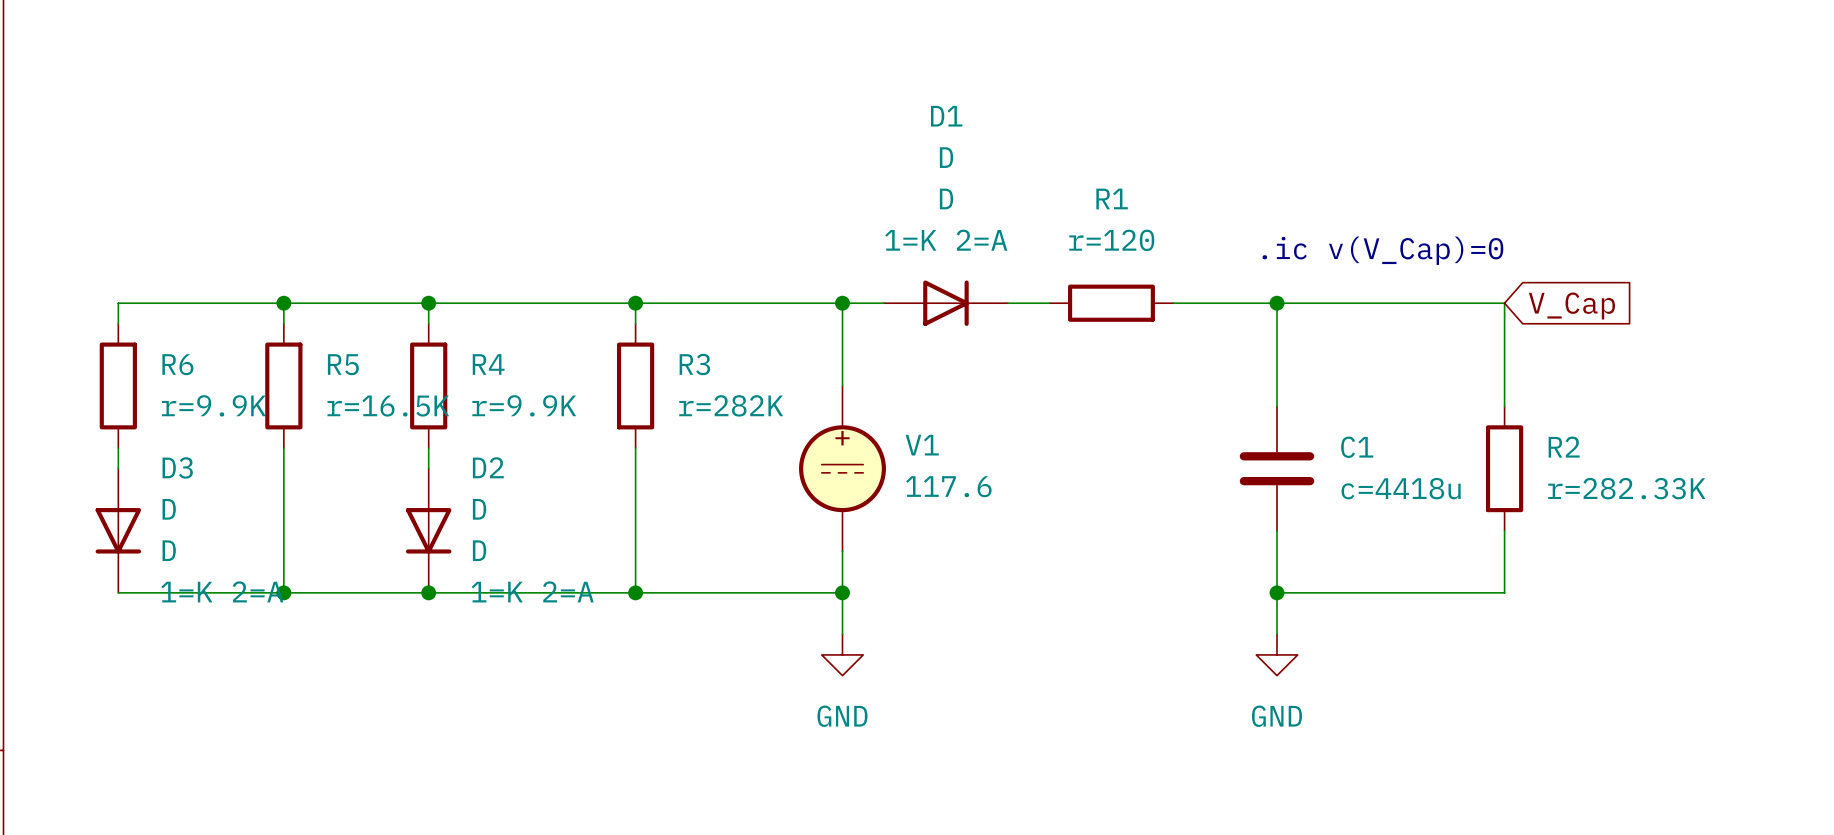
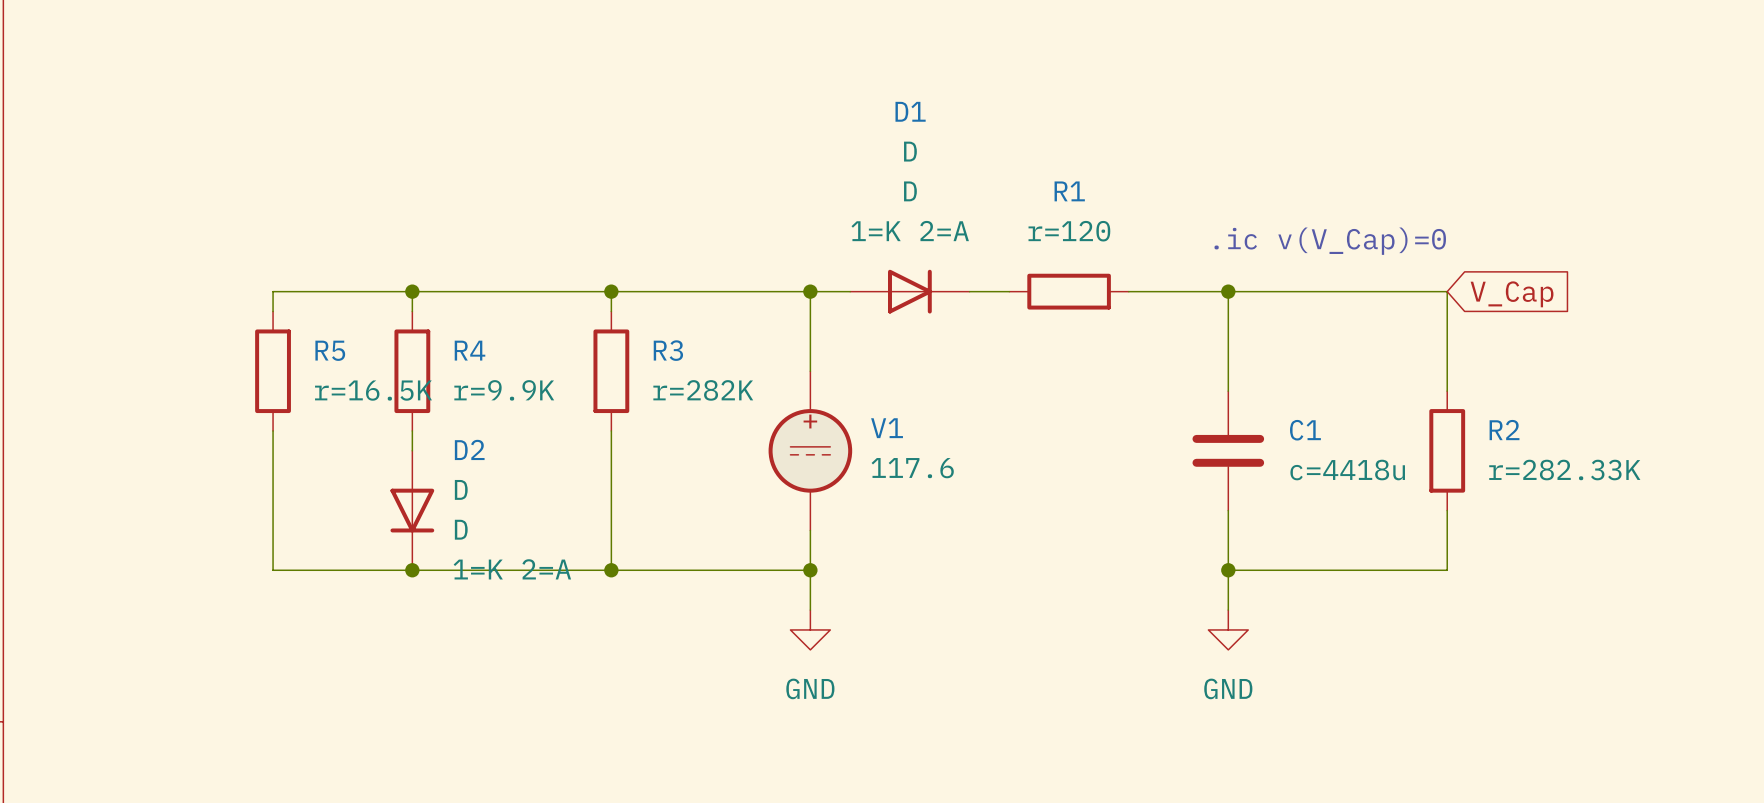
wire: (283, 303) (118, 303) (118, 323) -> none
junction: (283, 303) -> none
R6: r=9.9K (118, 385) -> none
wire: (118, 448) (118, 468) -> none
D3: D (118, 530) -> none
wire: (118, 592) (283, 592) -> none
junction: (283, 592) -> none

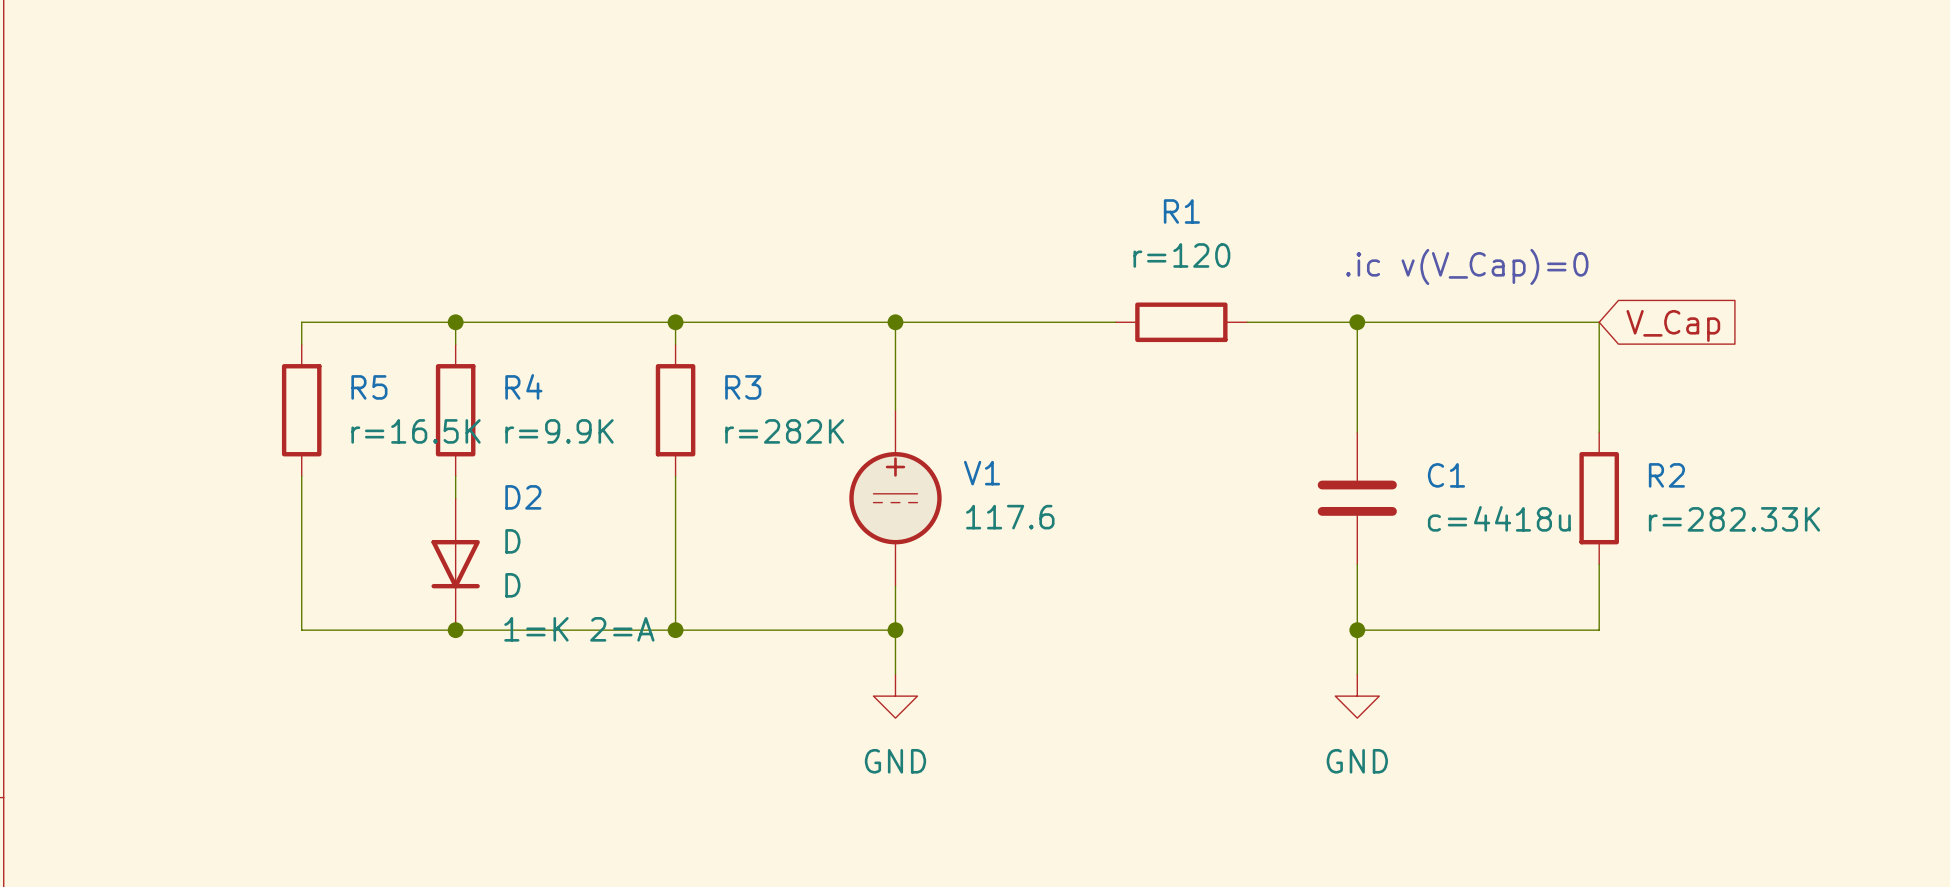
D1: D (909, 291) -> none

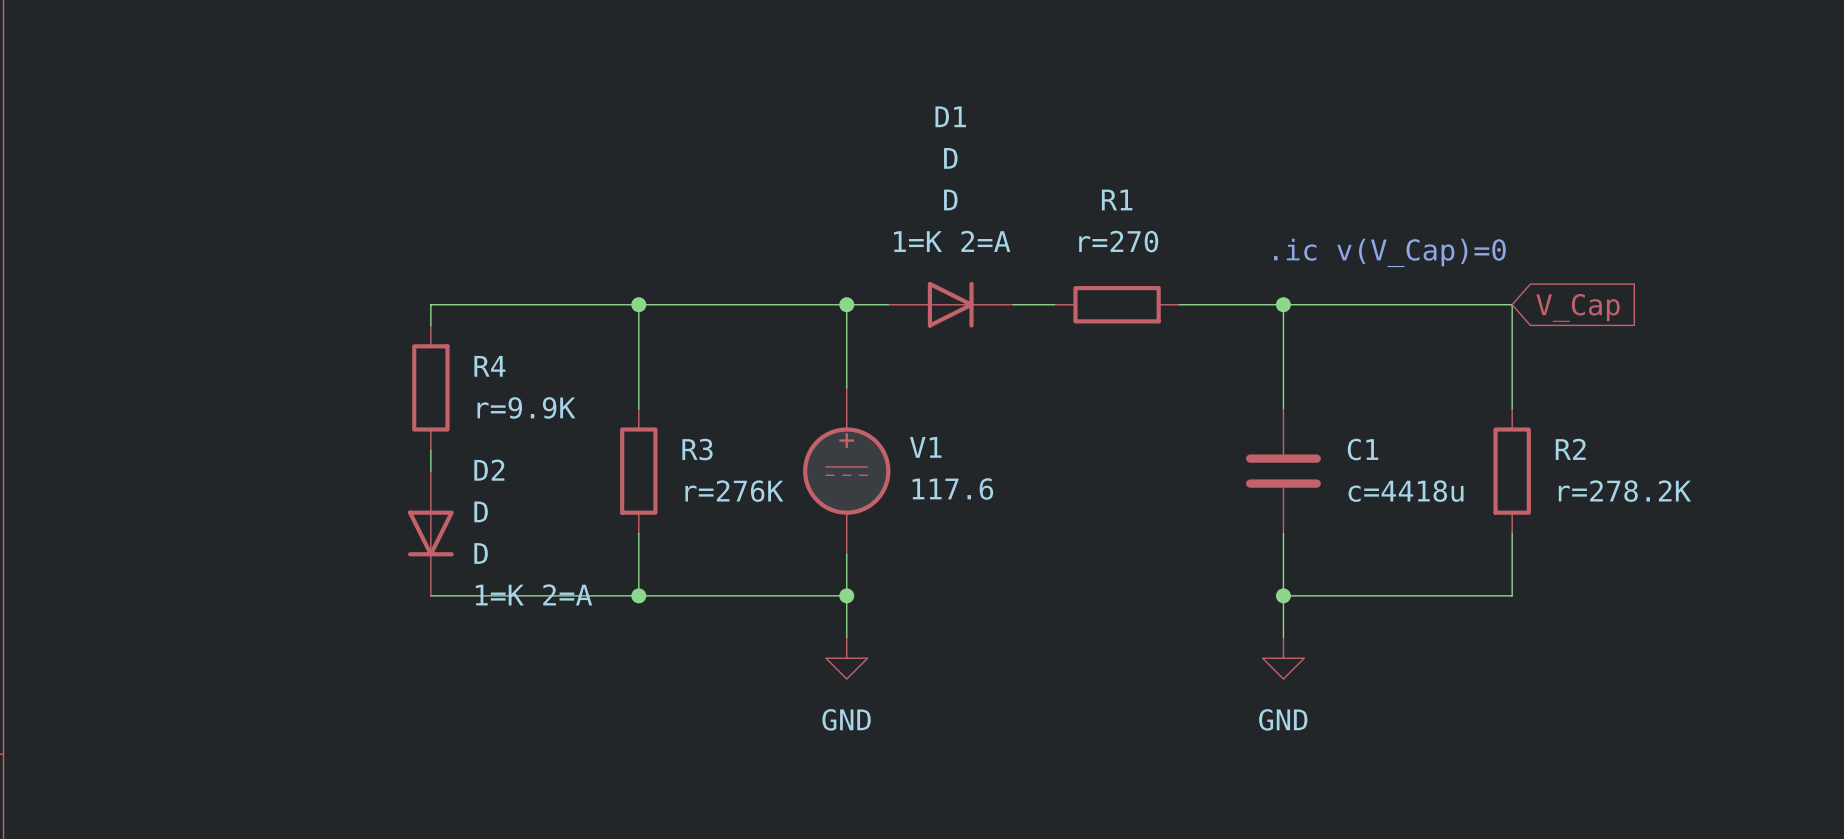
R1 value: r=120 (1181, 255) -> r=270 (1118, 241)
wire: (455, 322) (301, 322) (301, 344) -> none
junction: (455, 322) -> none
D1: none -> D (950, 304)
R5: r=16.5K (301, 410) -> none
R3 position: (675, 410) -> (638, 471)
R3 value: r=282K (784, 431) -> r=276K (734, 491)
wire: (301, 476) (301, 630) (455, 630) -> none
wire: (675, 476) (675, 564) -> (638, 325) (638, 408)
R2 value: r=282.33K (1734, 519) -> r=278.2K (1624, 491)
junction: (455, 630) -> none

